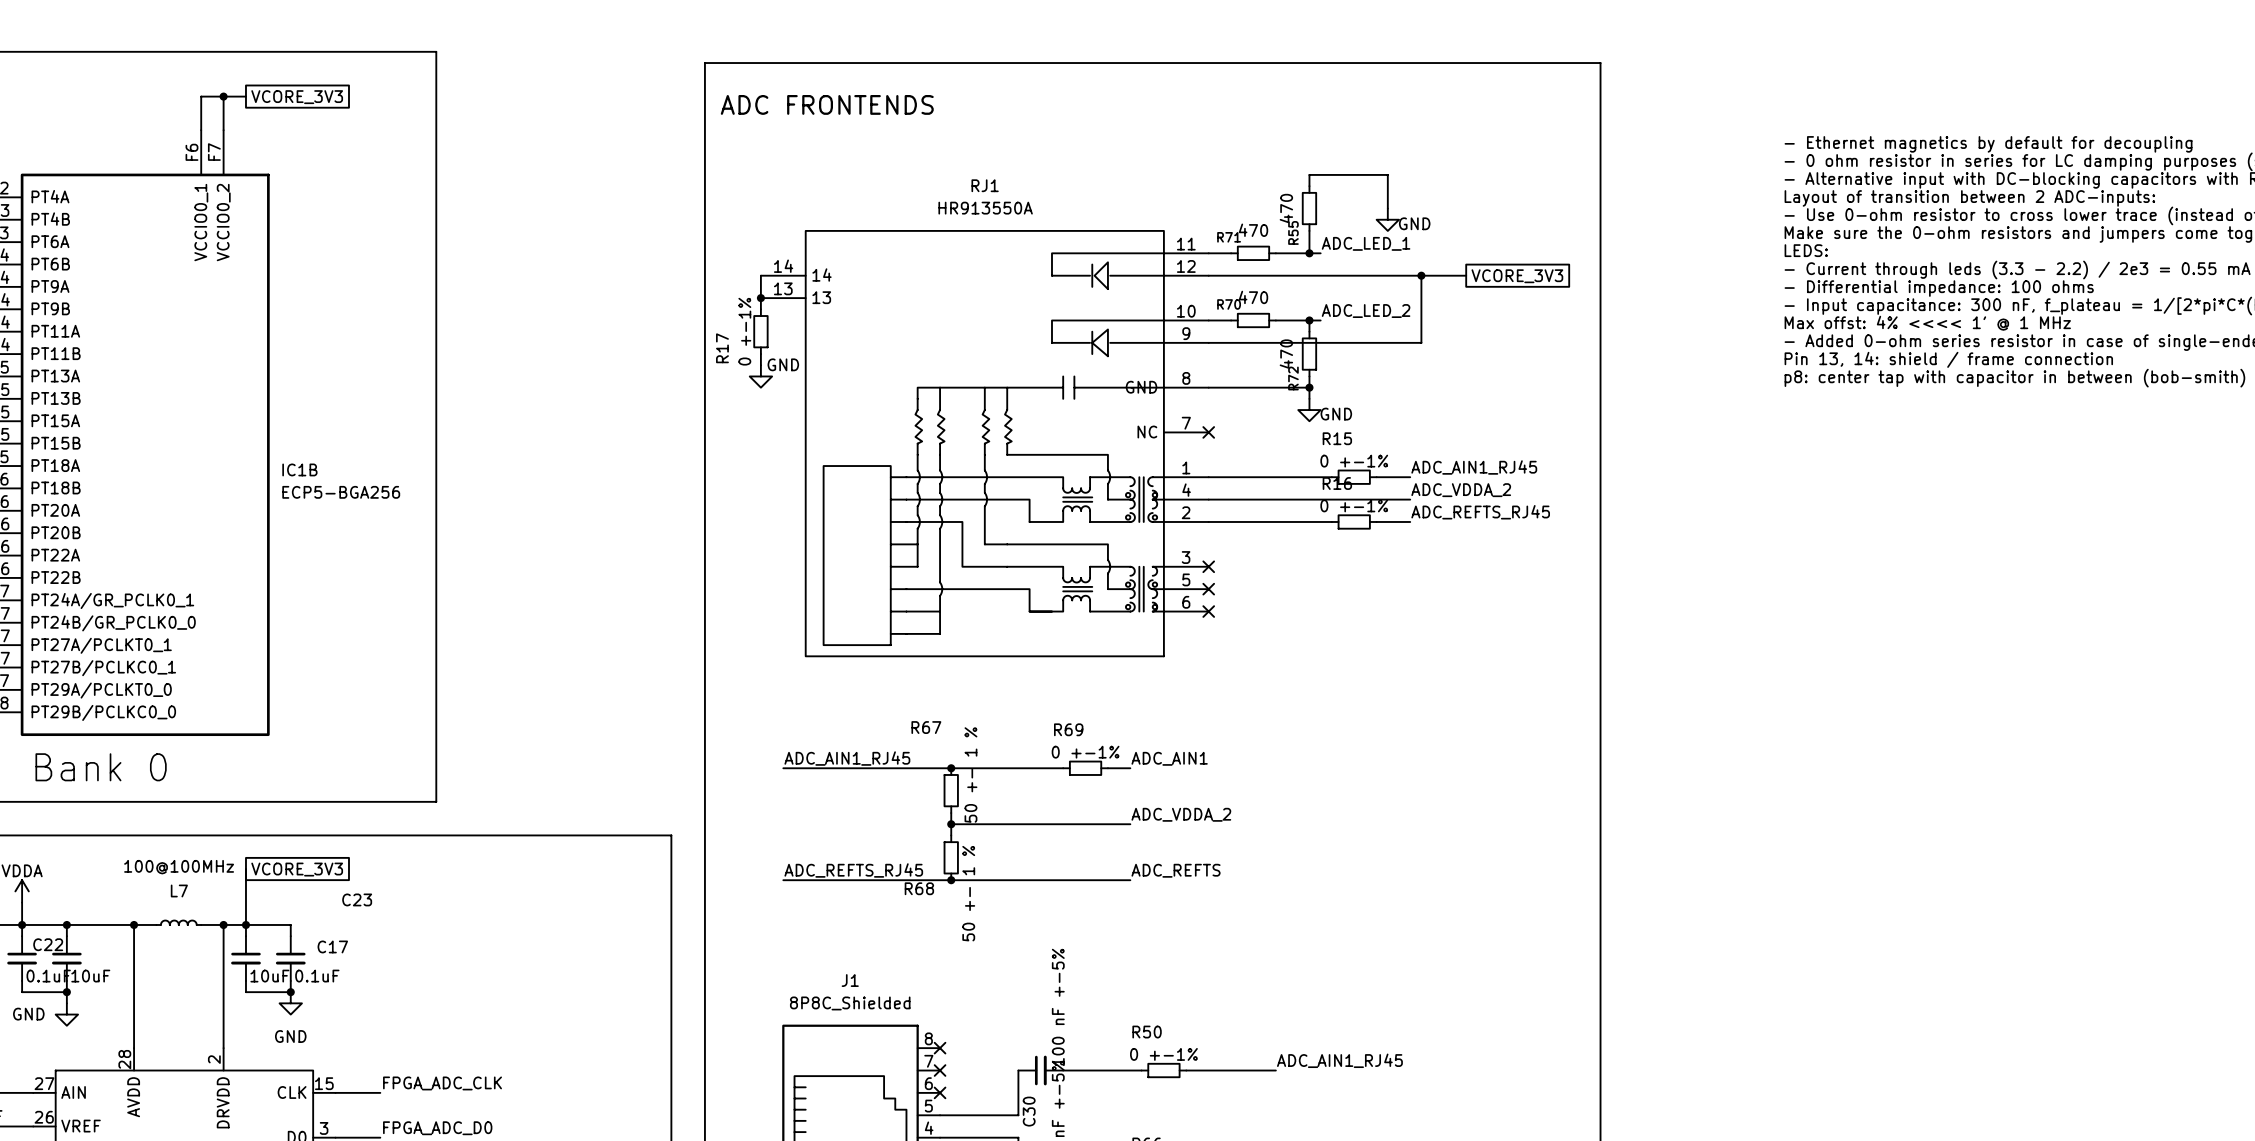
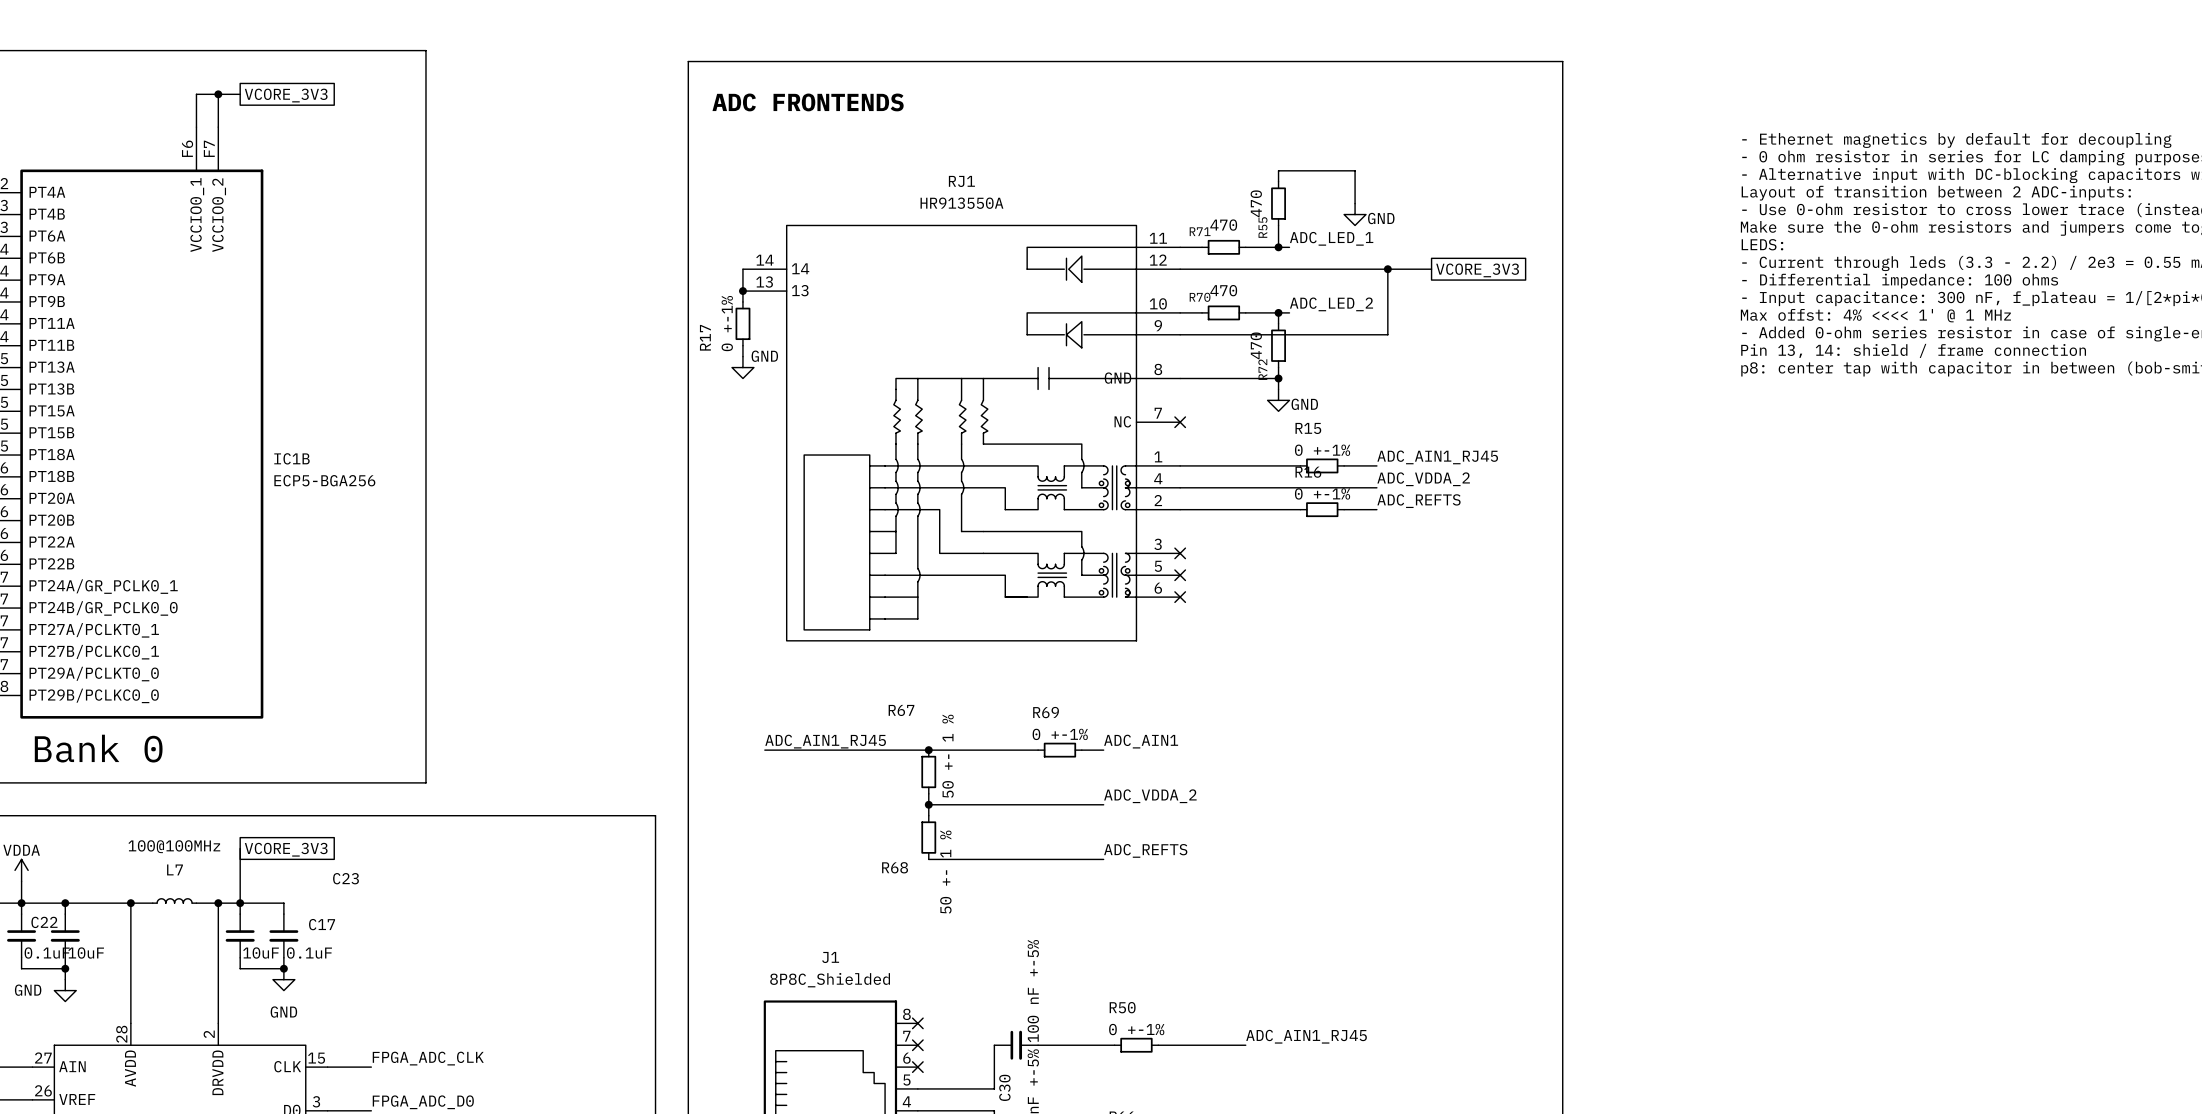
label: ADC_REFTS_RJ45 (1480, 512) -> ADC_REFTS (1418, 501)
label: ADC_REFTS_RJ45 (853, 870) -> none
wire: (783, 880) (951, 880) -> none
junction: (951, 880) -> none

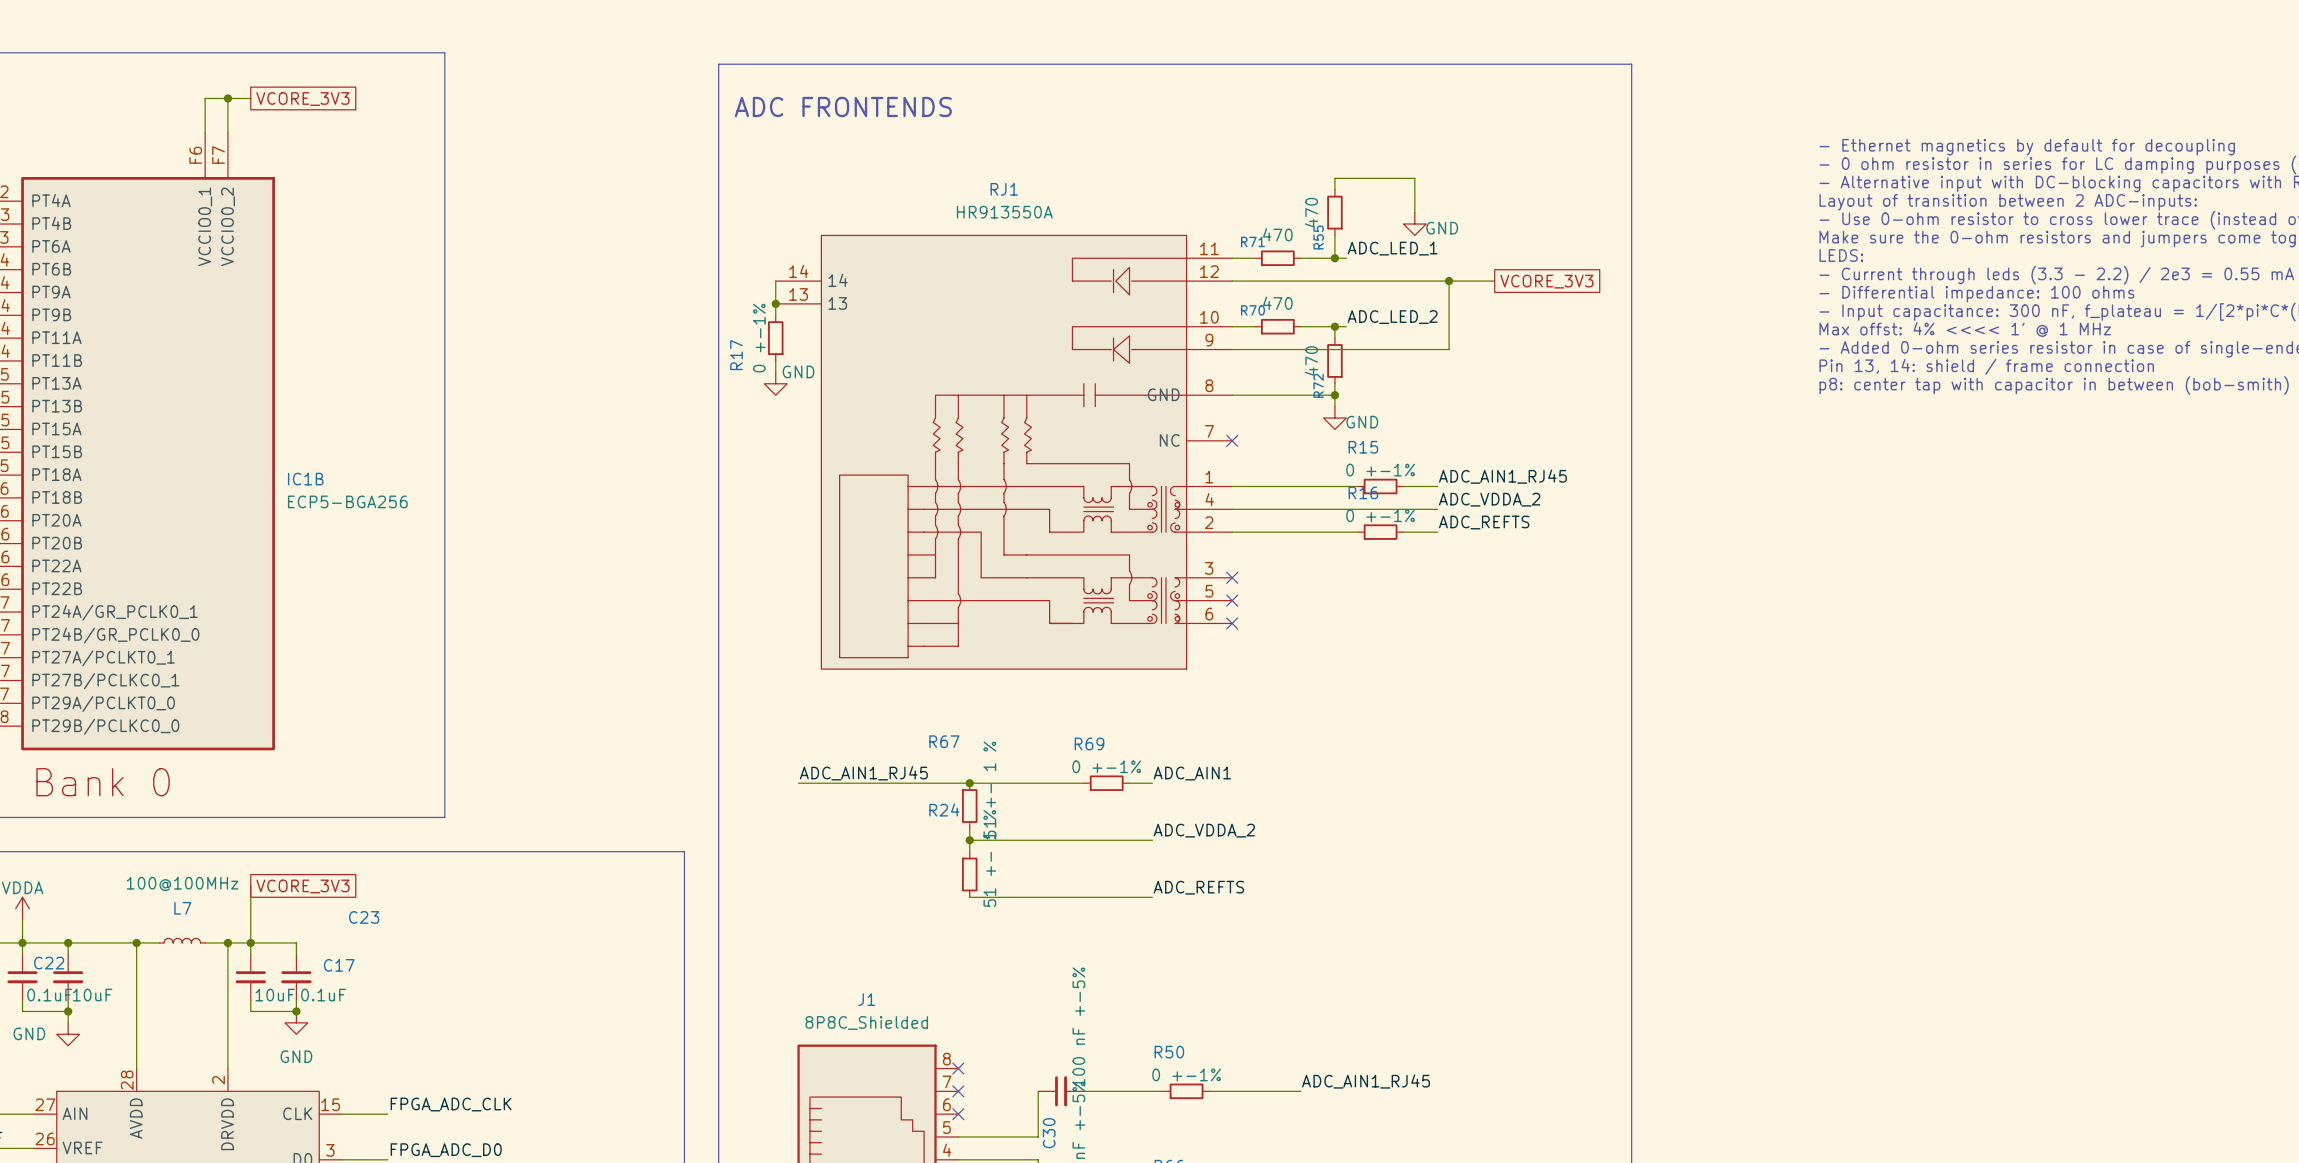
R67 value: 50 +- 1 % (948, 756) -> 51 +- 1 % (989, 790)
R68 name: R68 (895, 867) -> R24 (944, 809)
R68 value: 50 +- 1 % (945, 872) -> 51 +- 1 % (989, 858)

